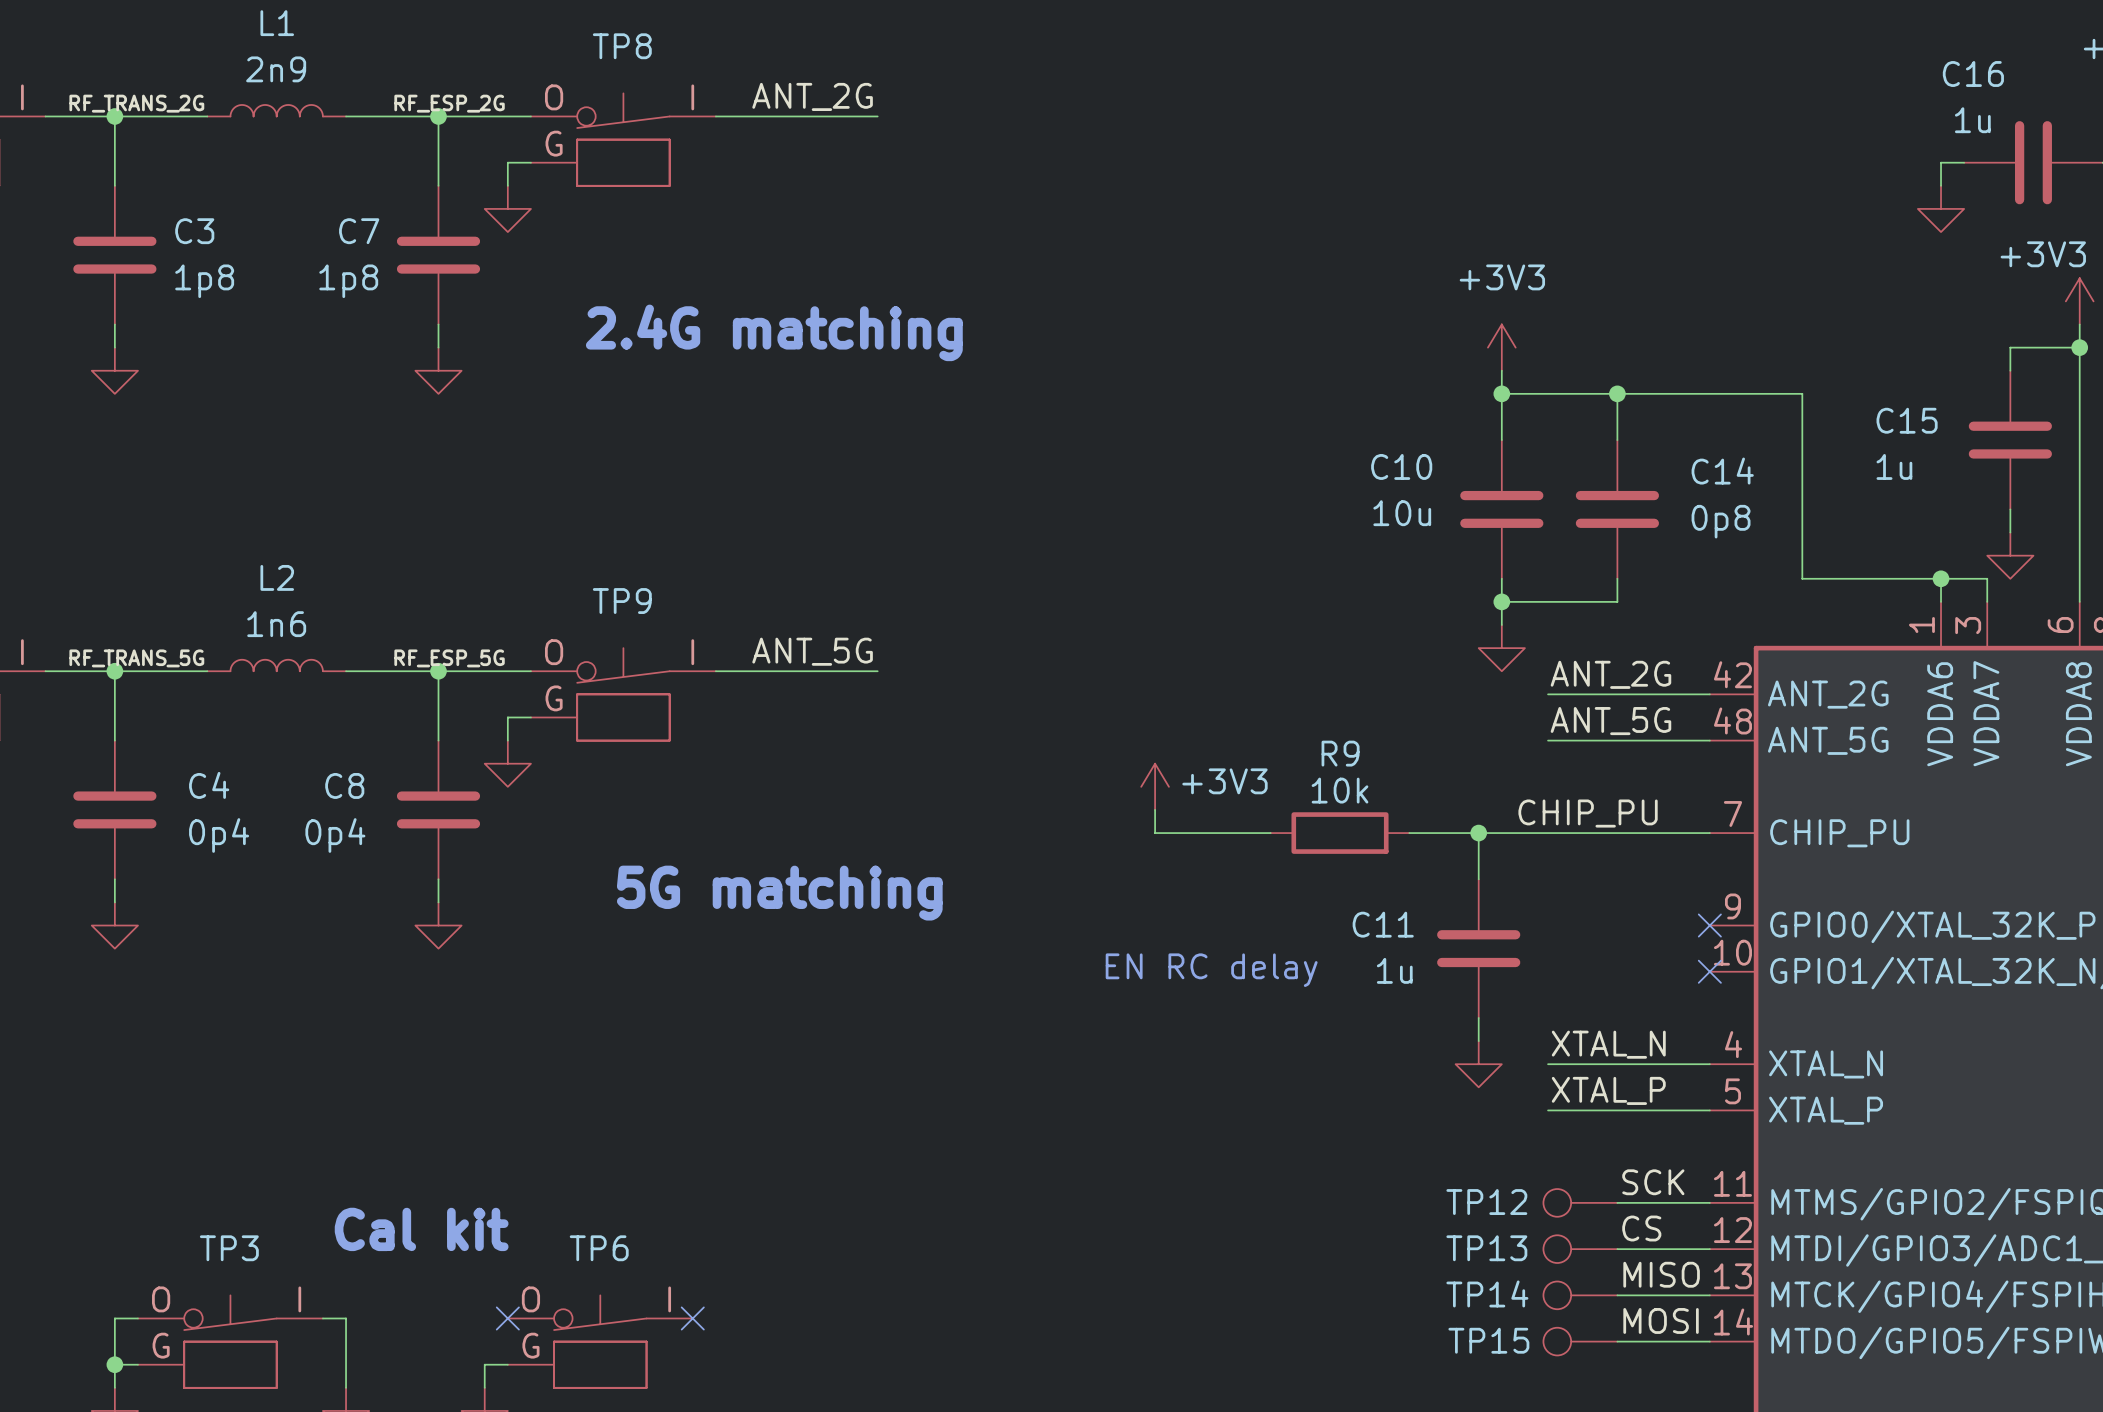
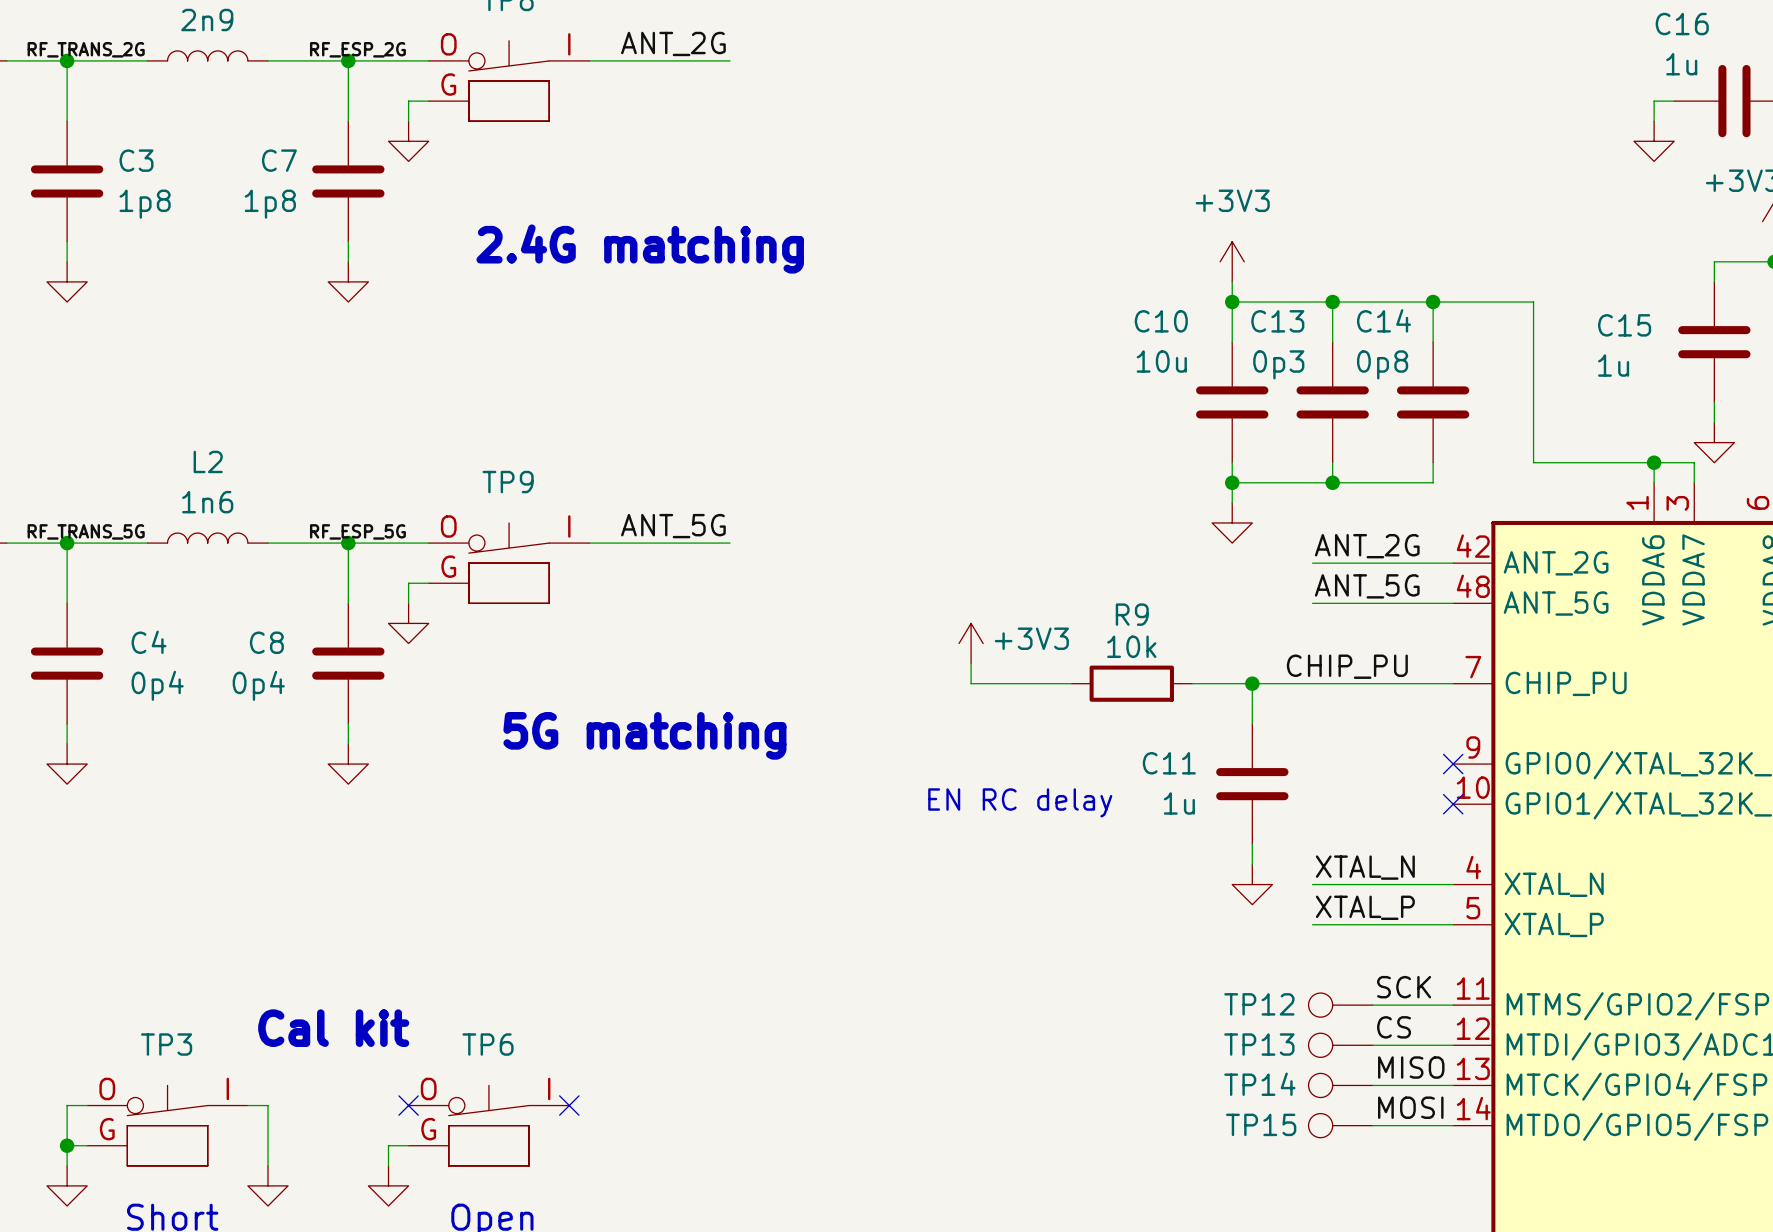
power symbol position: +3V3 (1501, 347) -> +3V3 (1232, 261)
wire: (1501, 370) (1501, 440) -> (1232, 281) (1232, 342)
wire: none -> (1232, 302) (1272, 302)
junction: none -> (1232, 302)
junction: (1501, 393) -> none
junction: none -> (1332, 302)
wire: (1617, 393) (1617, 440) -> (1332, 302) (1332, 342)
junction: (1617, 393) -> none
wire: none -> (1433, 302) (1433, 342)
junction: none -> (1433, 302)
C10 name position: C10 (1401, 466) -> C10 (1161, 321)
C14 name position: C14 (1722, 471) -> C14 (1384, 320)
C10 position: (1501, 509) -> (1232, 402)
C13: none -> 0p3 (1332, 402)
C14 position: (1617, 509) -> (1433, 402)
C10 value position: 10u (1402, 513) -> 10u (1161, 361)
C14 value position: 0p8 (1721, 521) -> 0p8 (1382, 364)
wire: (1501, 578) (1501, 625) -> (1232, 462) (1232, 502)
wire: none -> (1332, 462) (1332, 482)
wire: (1617, 578) (1617, 601) -> (1433, 462) (1433, 482) (1372, 482)
wire: none -> (1232, 482) (1272, 482)
junction: none -> (1232, 482)
junction: (1501, 601) -> none
junction: none -> (1332, 482)
power symbol position: (1501, 648) -> (1232, 522)

